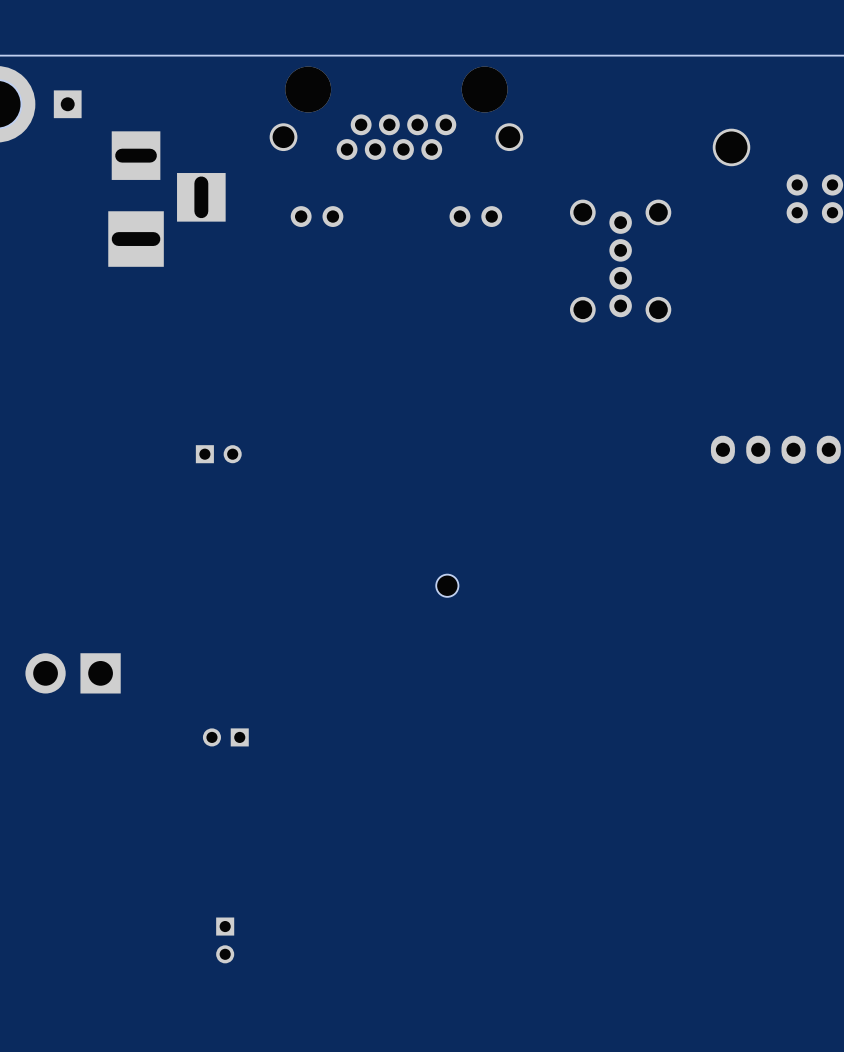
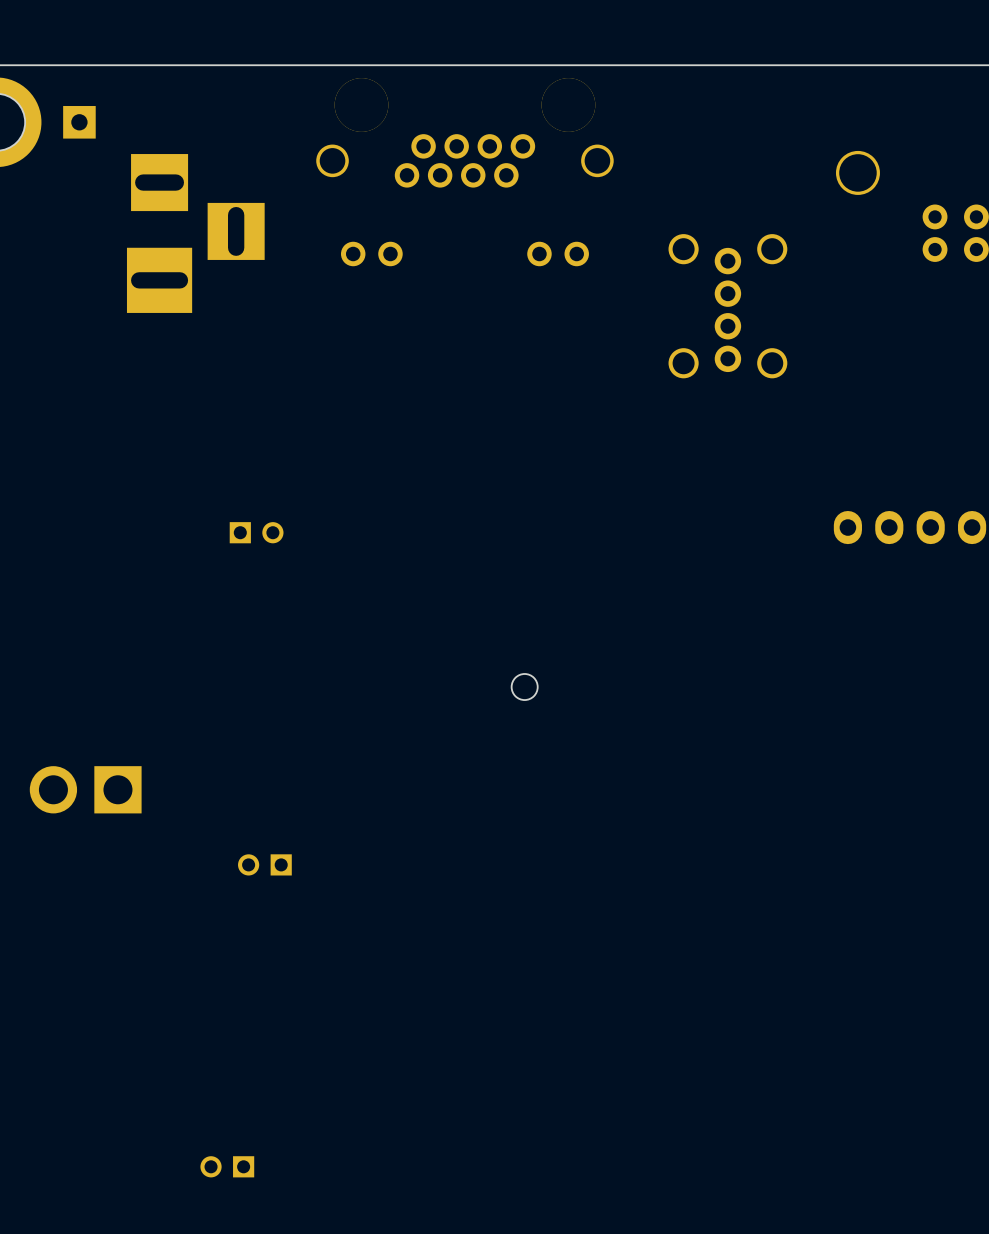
part rotation: 0° (225, 940) -> 90° clockwise (227, 1166)
part position: (225, 940) -> (227, 1166)

